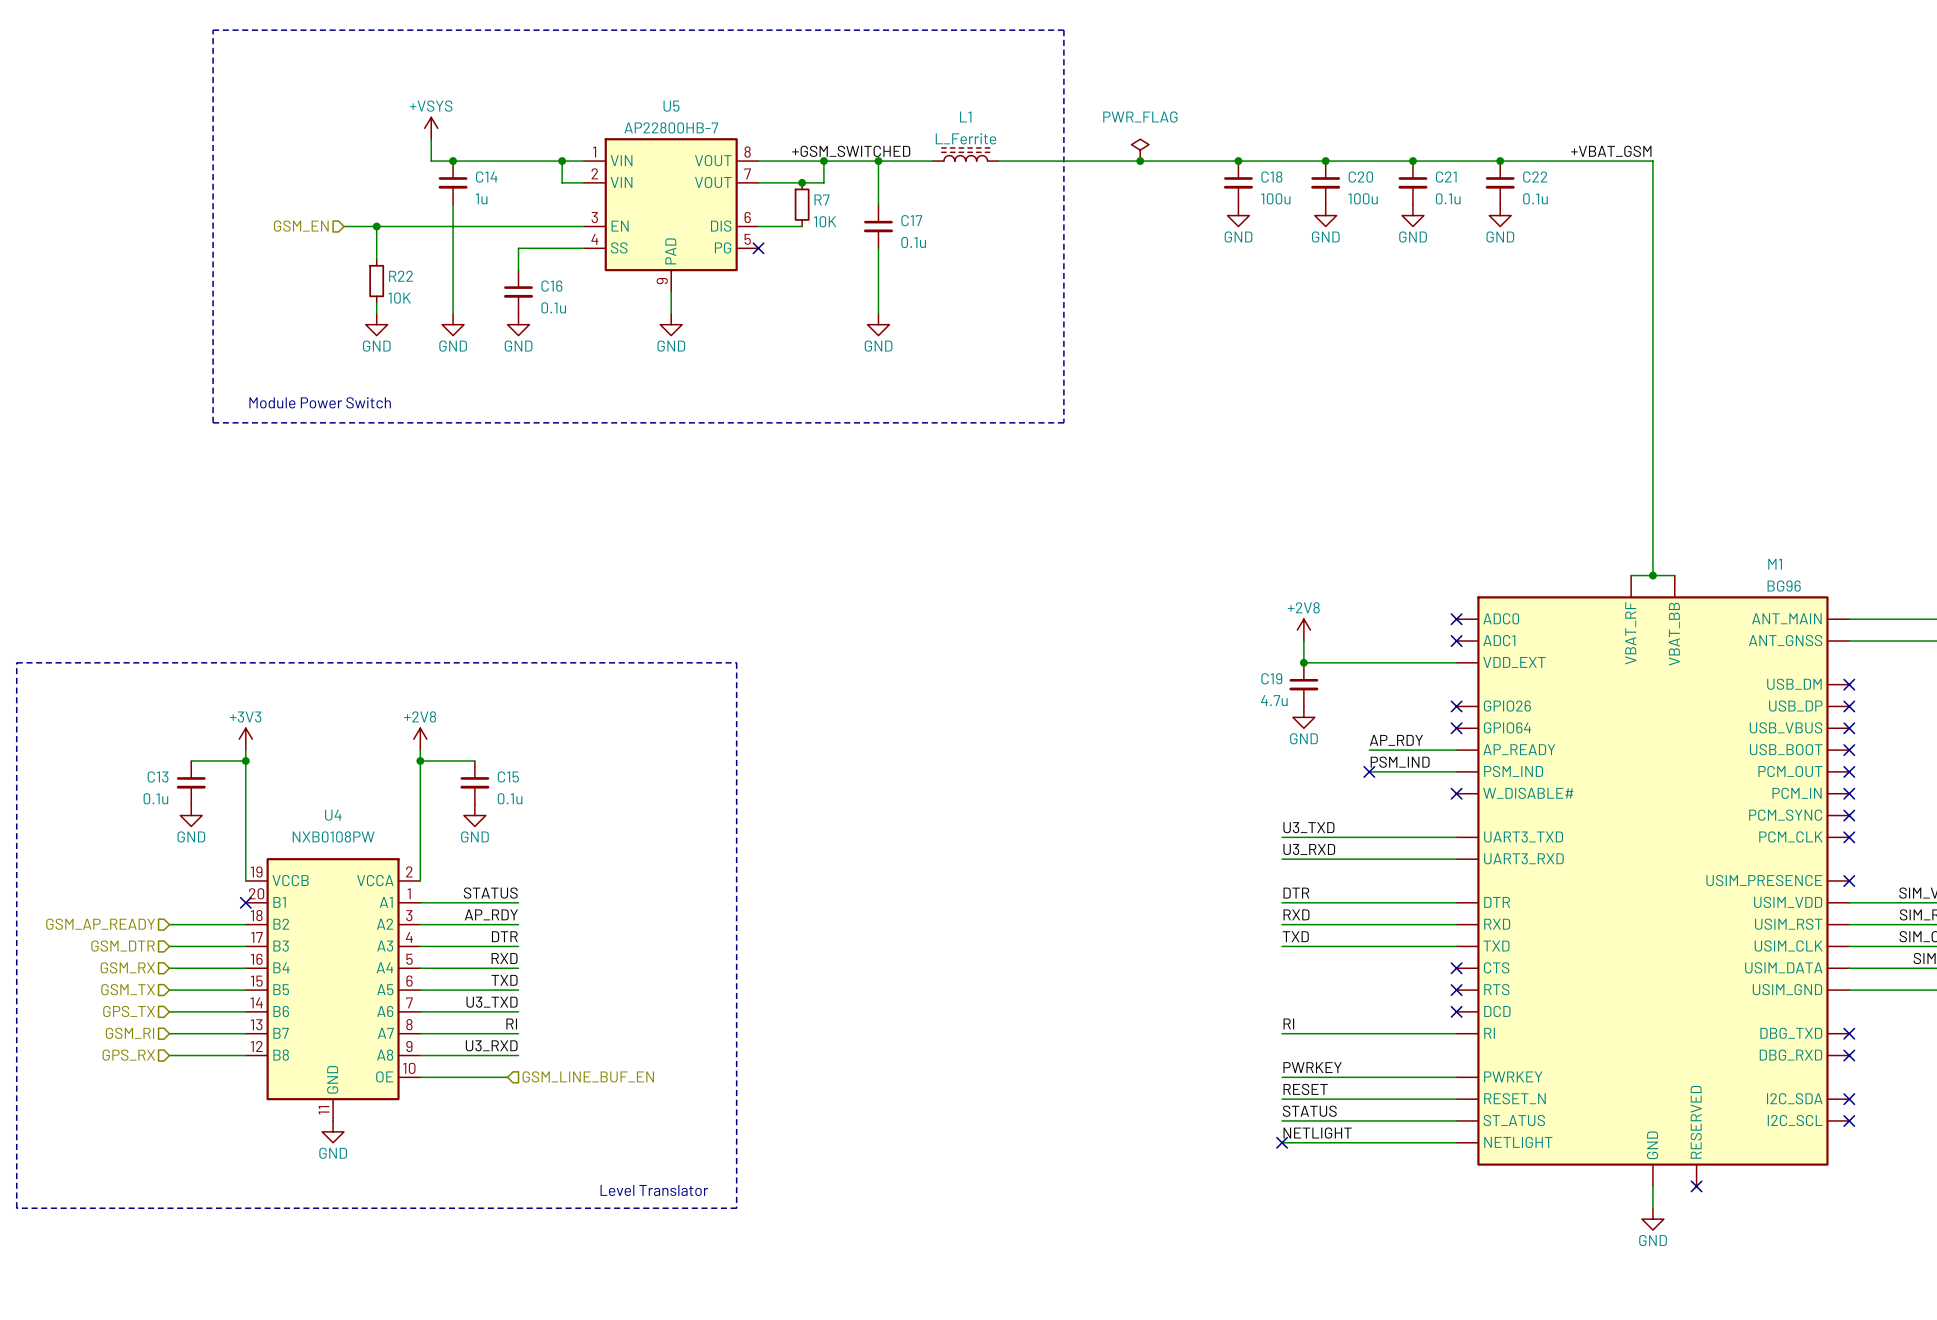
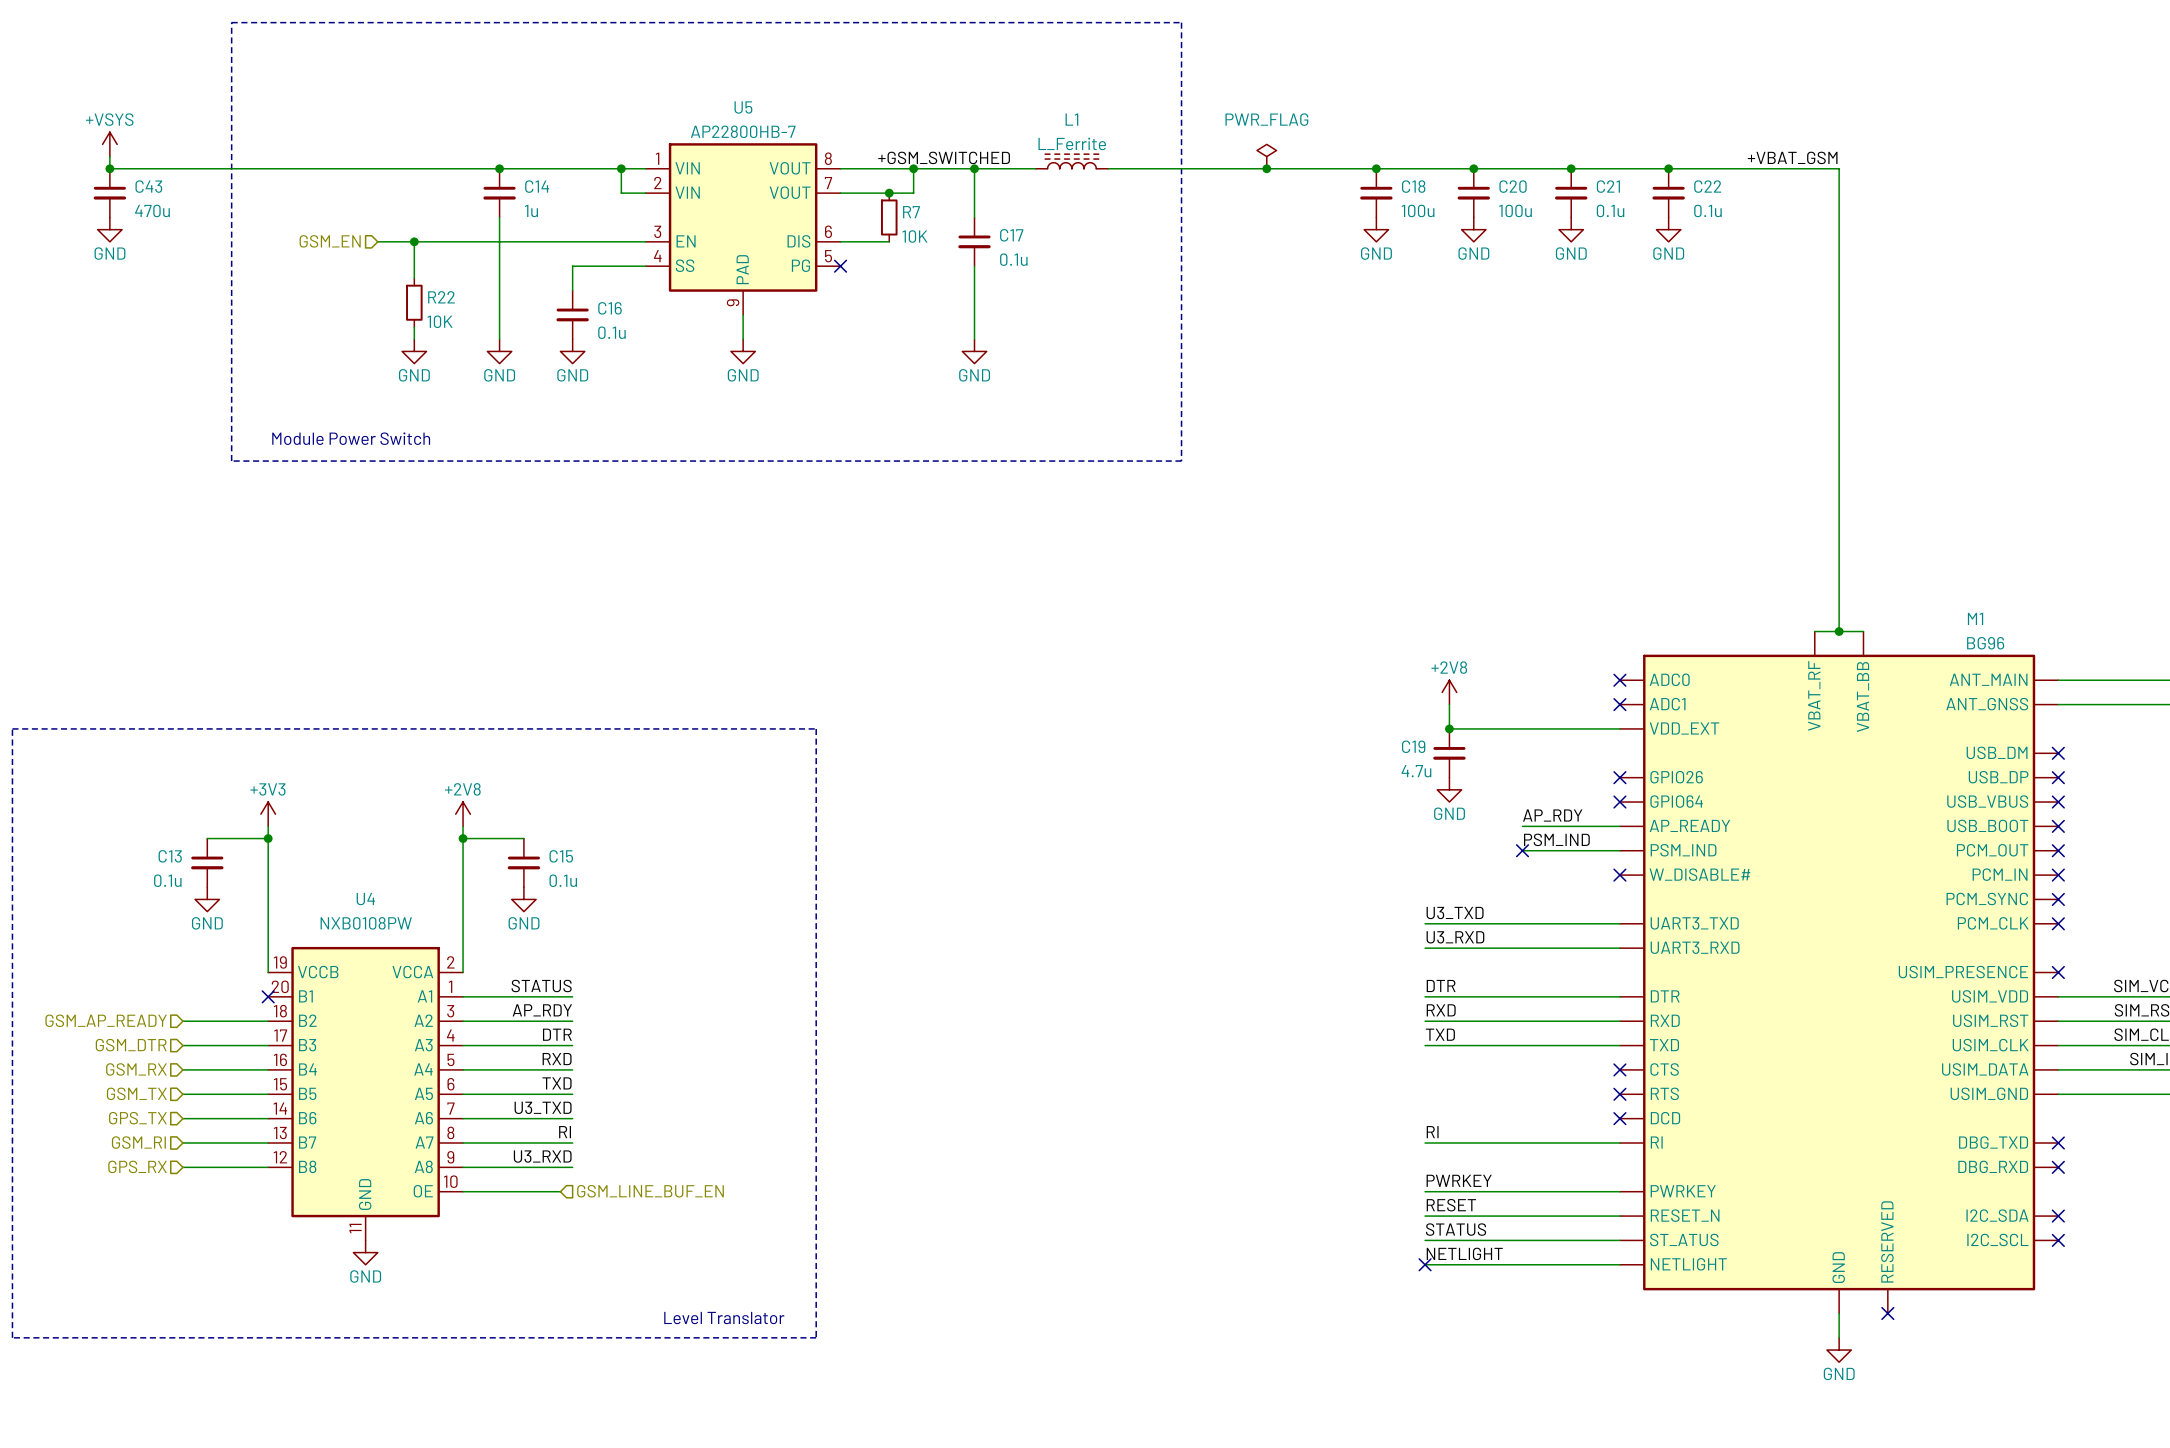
power symbol: +VSYS (431, 128) -> none
power symbol: none -> +VSYS (109, 144)
wire: (431, 139) (431, 161) -> (109, 156) (109, 168) (475, 168)
junction: none -> (109, 168)
C43: none -> 470u (109, 193)
power symbol: none -> GND (109, 229)

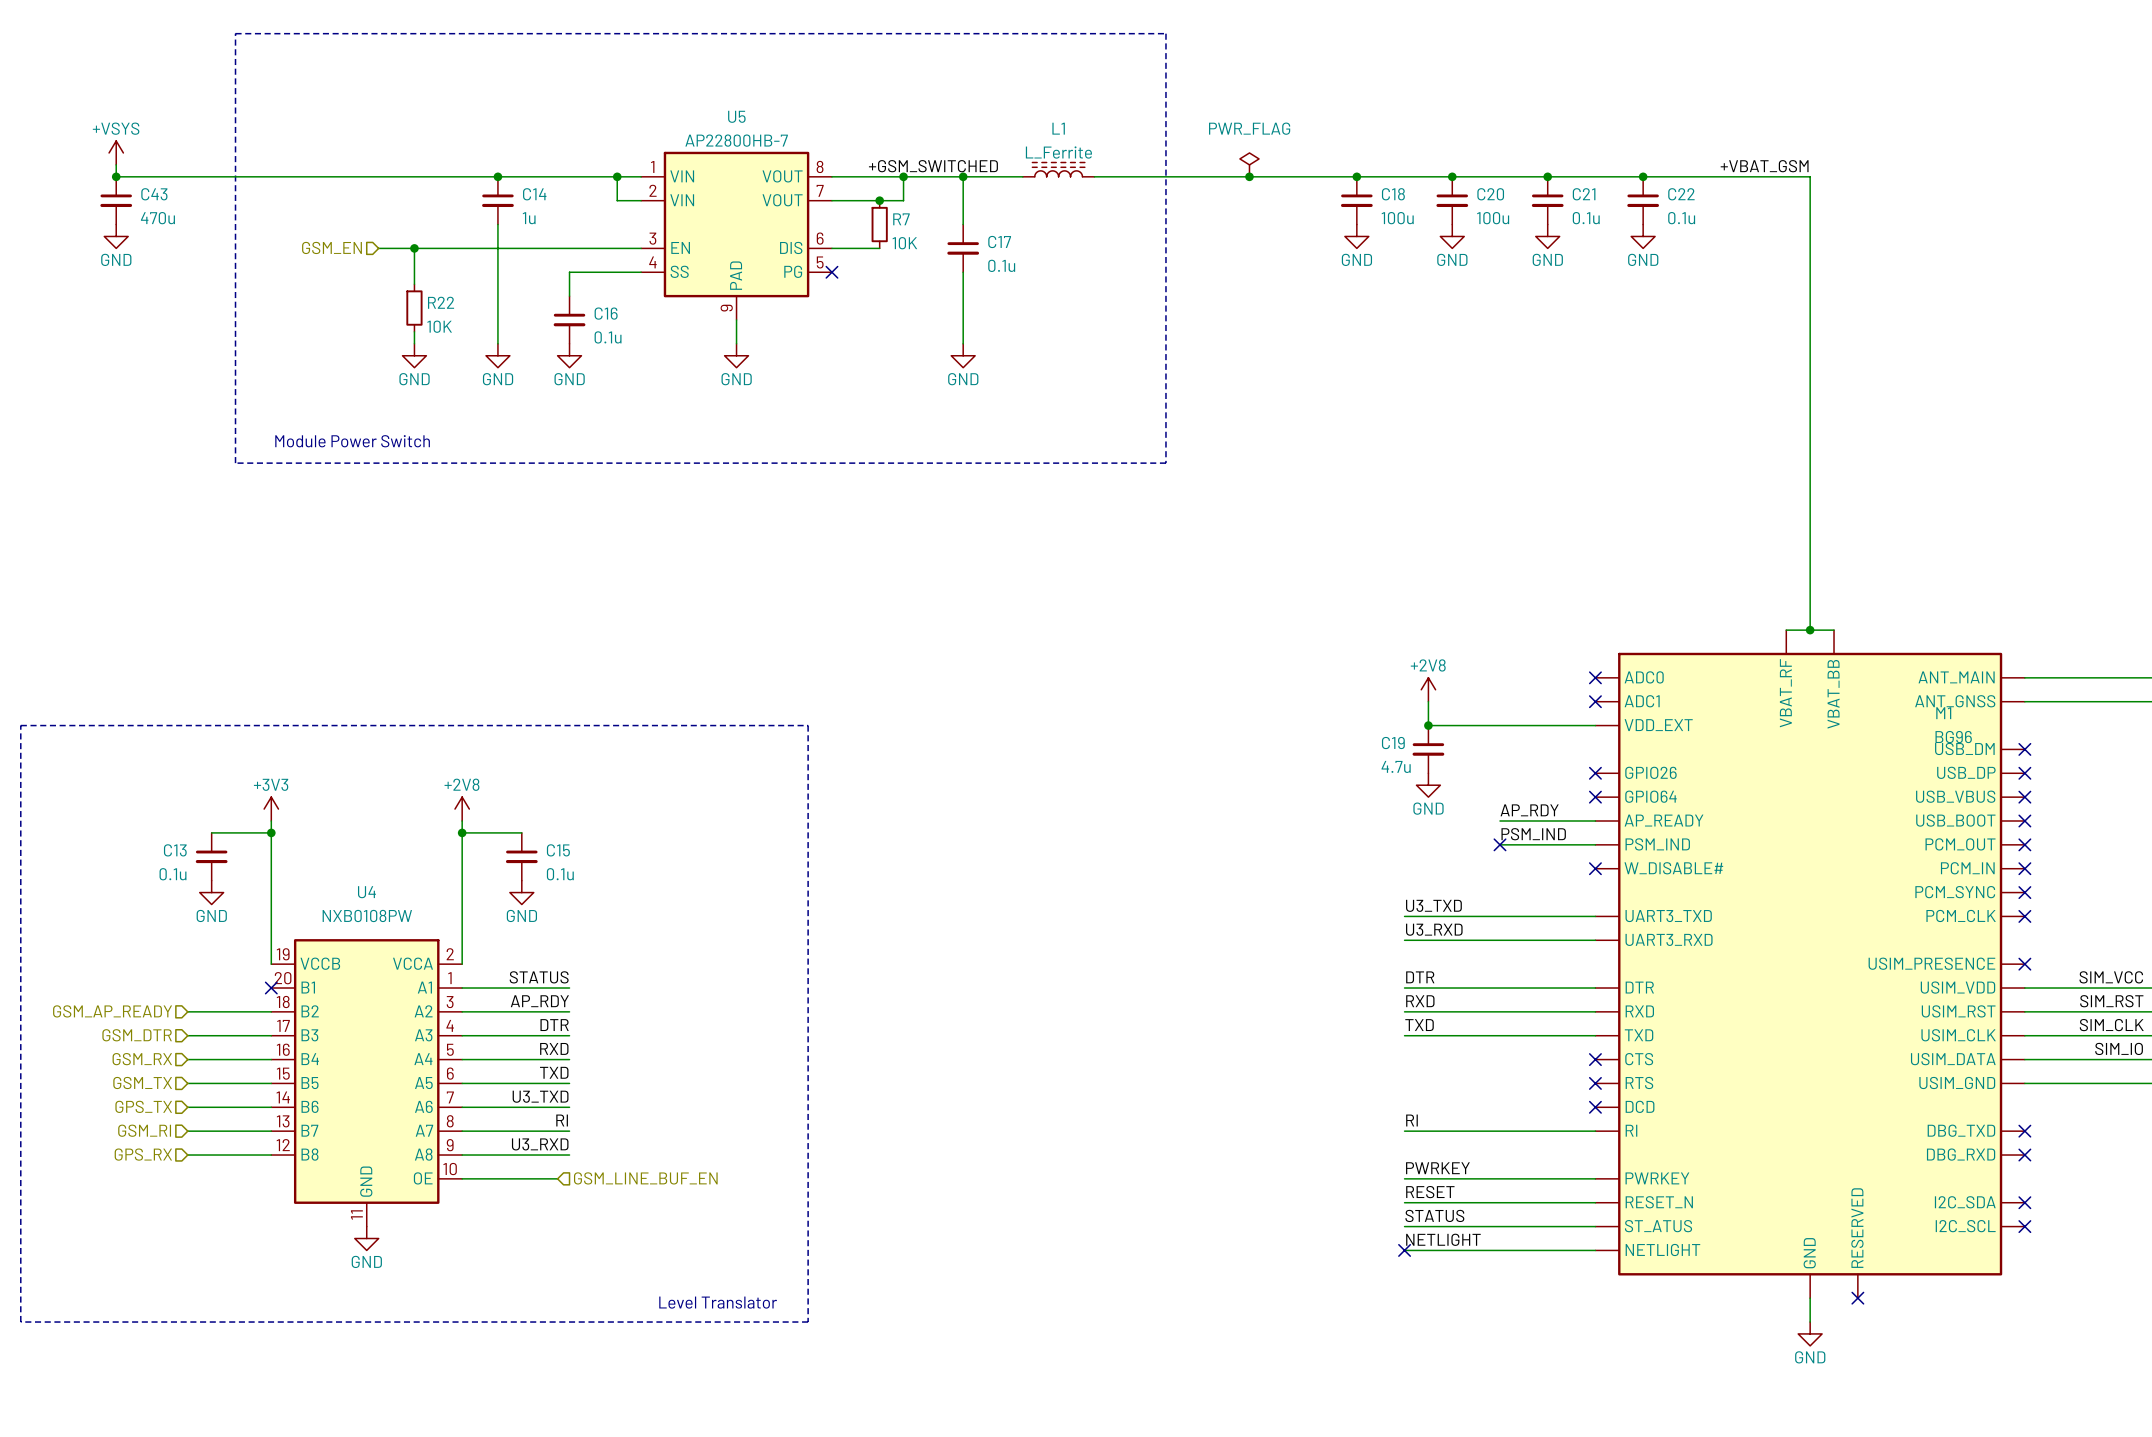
M1 name position: M1 (1975, 618) -> M1 (1943, 713)
M1 value position: BG96 (1985, 643) -> BG96 (1953, 737)

